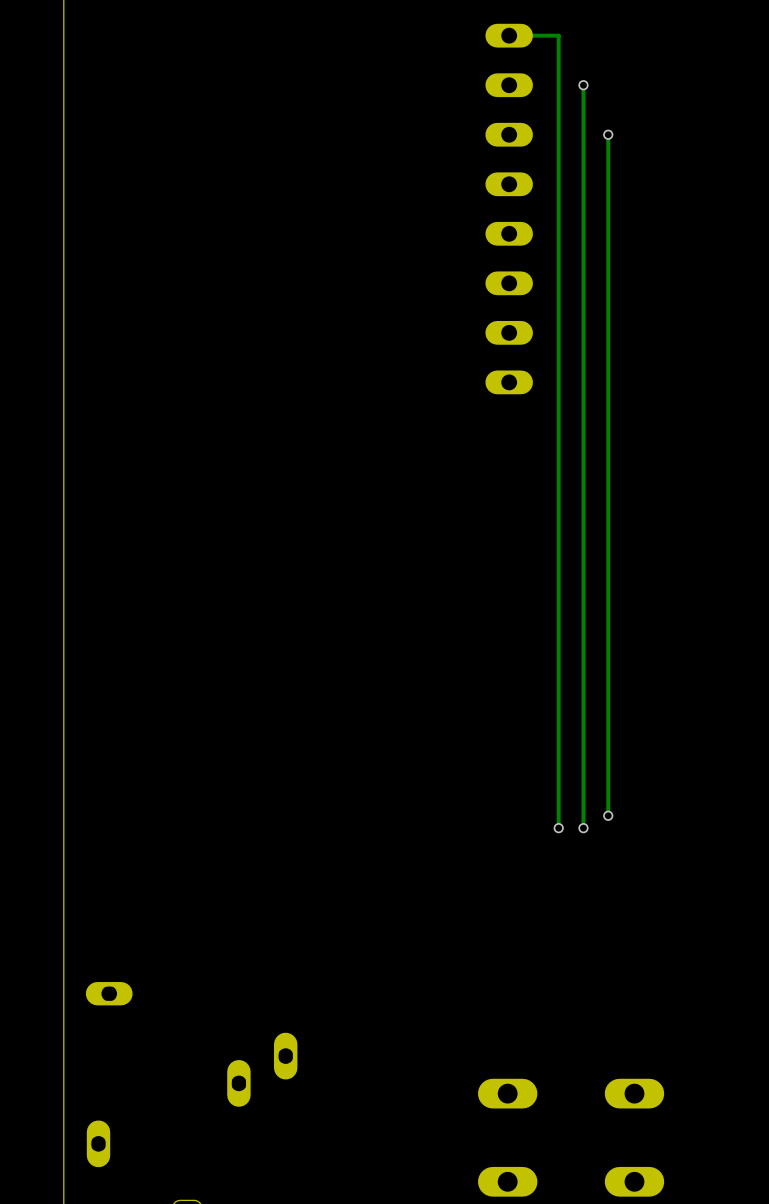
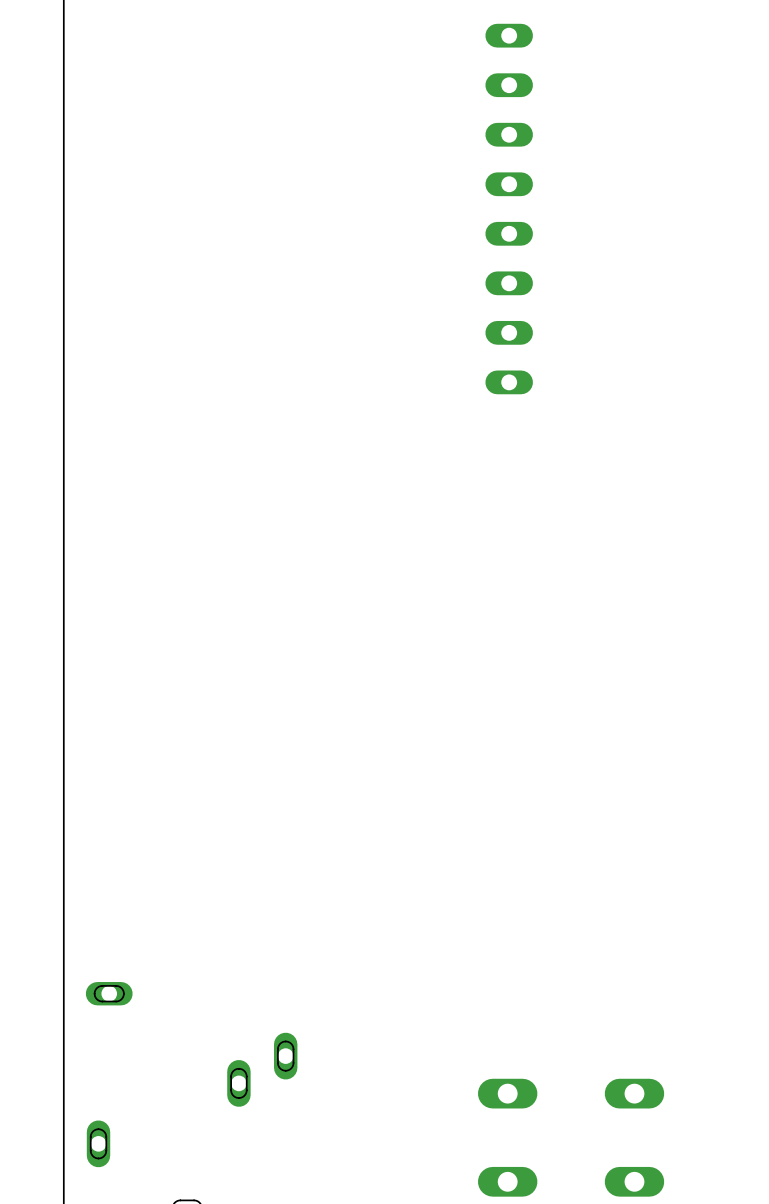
track: (509, 35) (558, 35) (558, 828) -> none
track: (583, 85) (583, 828) -> none
via: (583, 85) -> none
track: (608, 134) (608, 815) -> none
via: (608, 134) -> none
via: (608, 815) -> none
via: (558, 828) -> none
via: (583, 828) -> none

